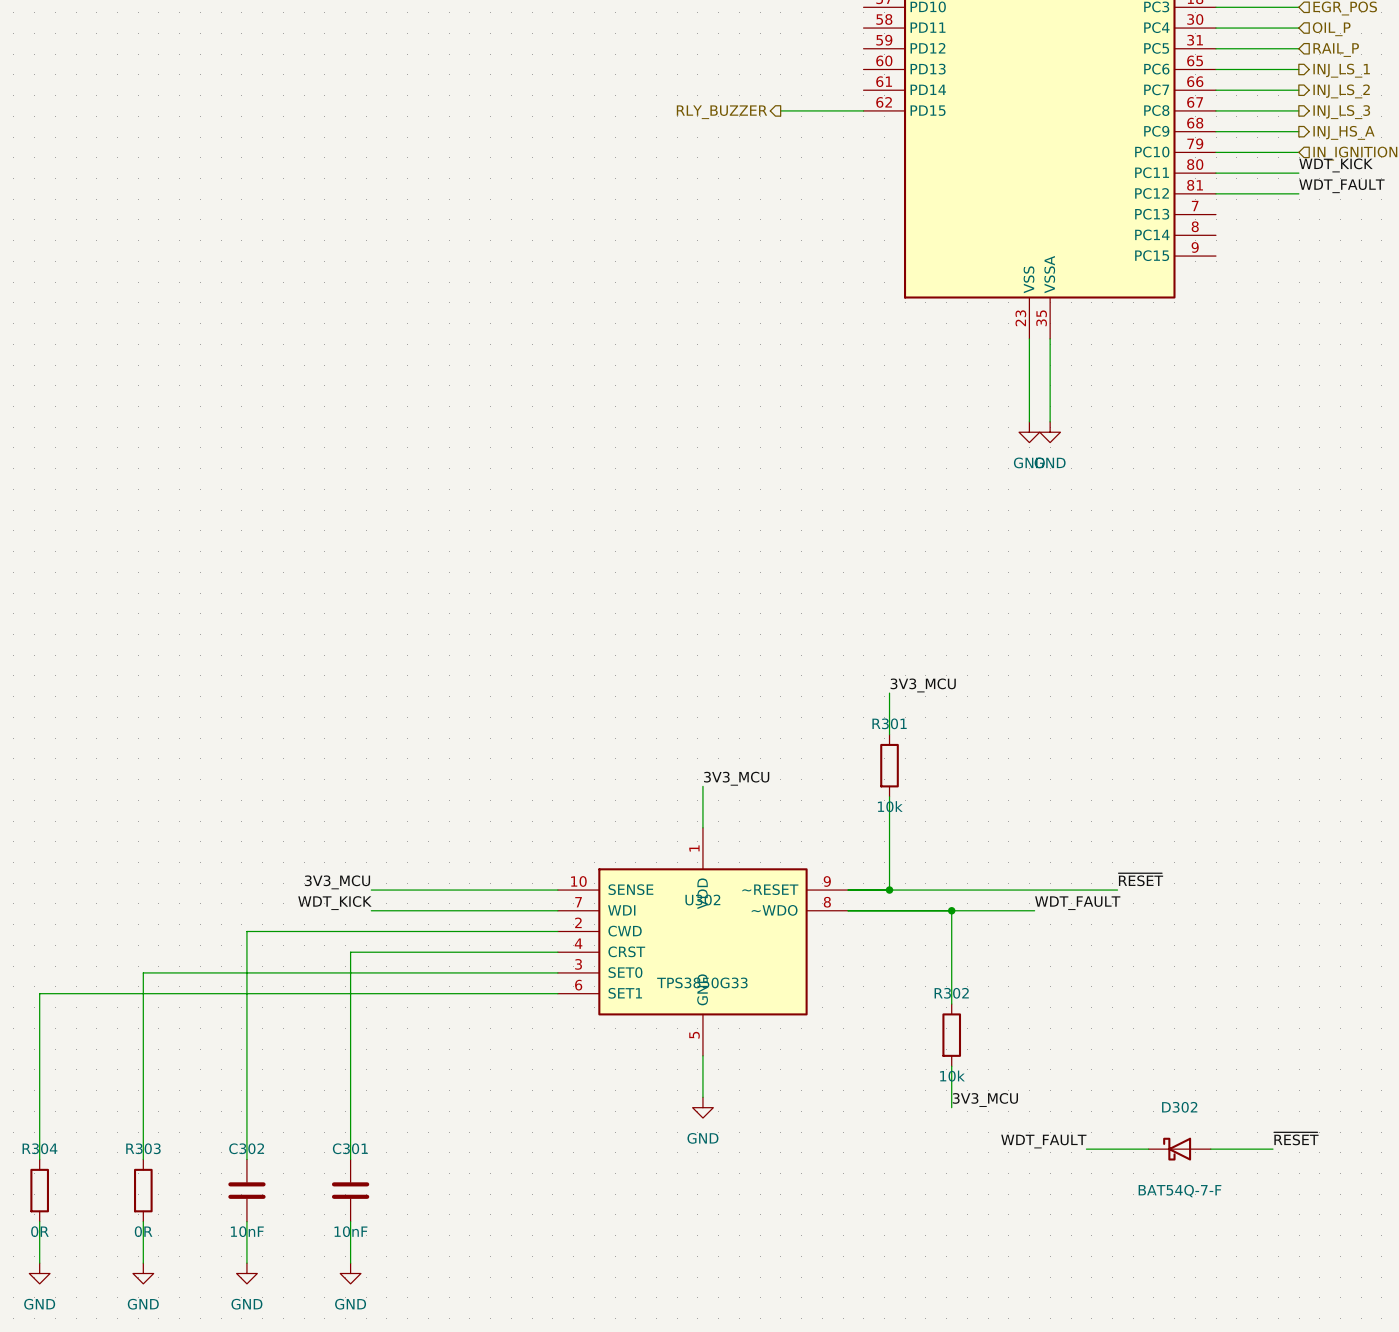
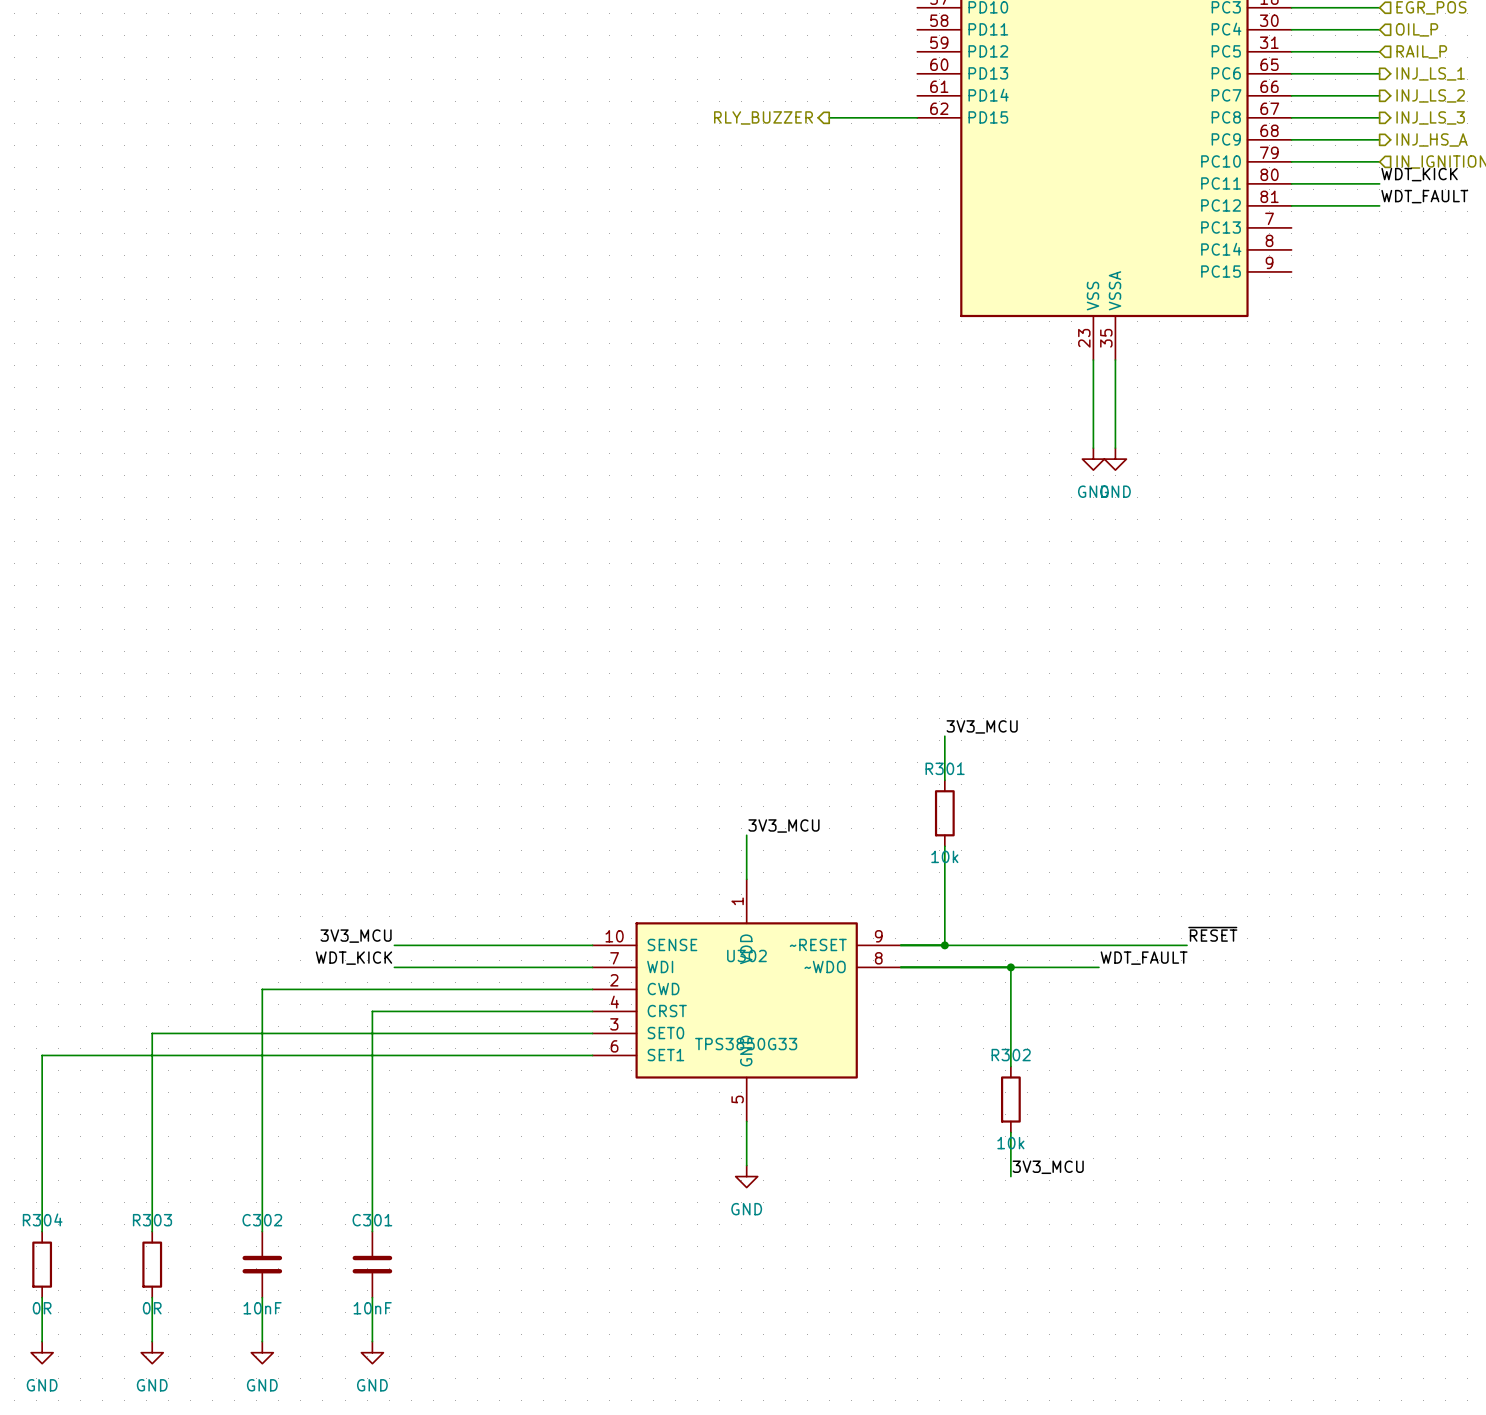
label: ~{RESET} (1296, 1138) -> none
label: WDT_FAULT (1043, 1141) -> none
wire: (1086, 1149) (1148, 1149) -> none
D302: BAT54Q-7-F (1179, 1149) -> none
wire: (1210, 1149) (1272, 1149) -> none

